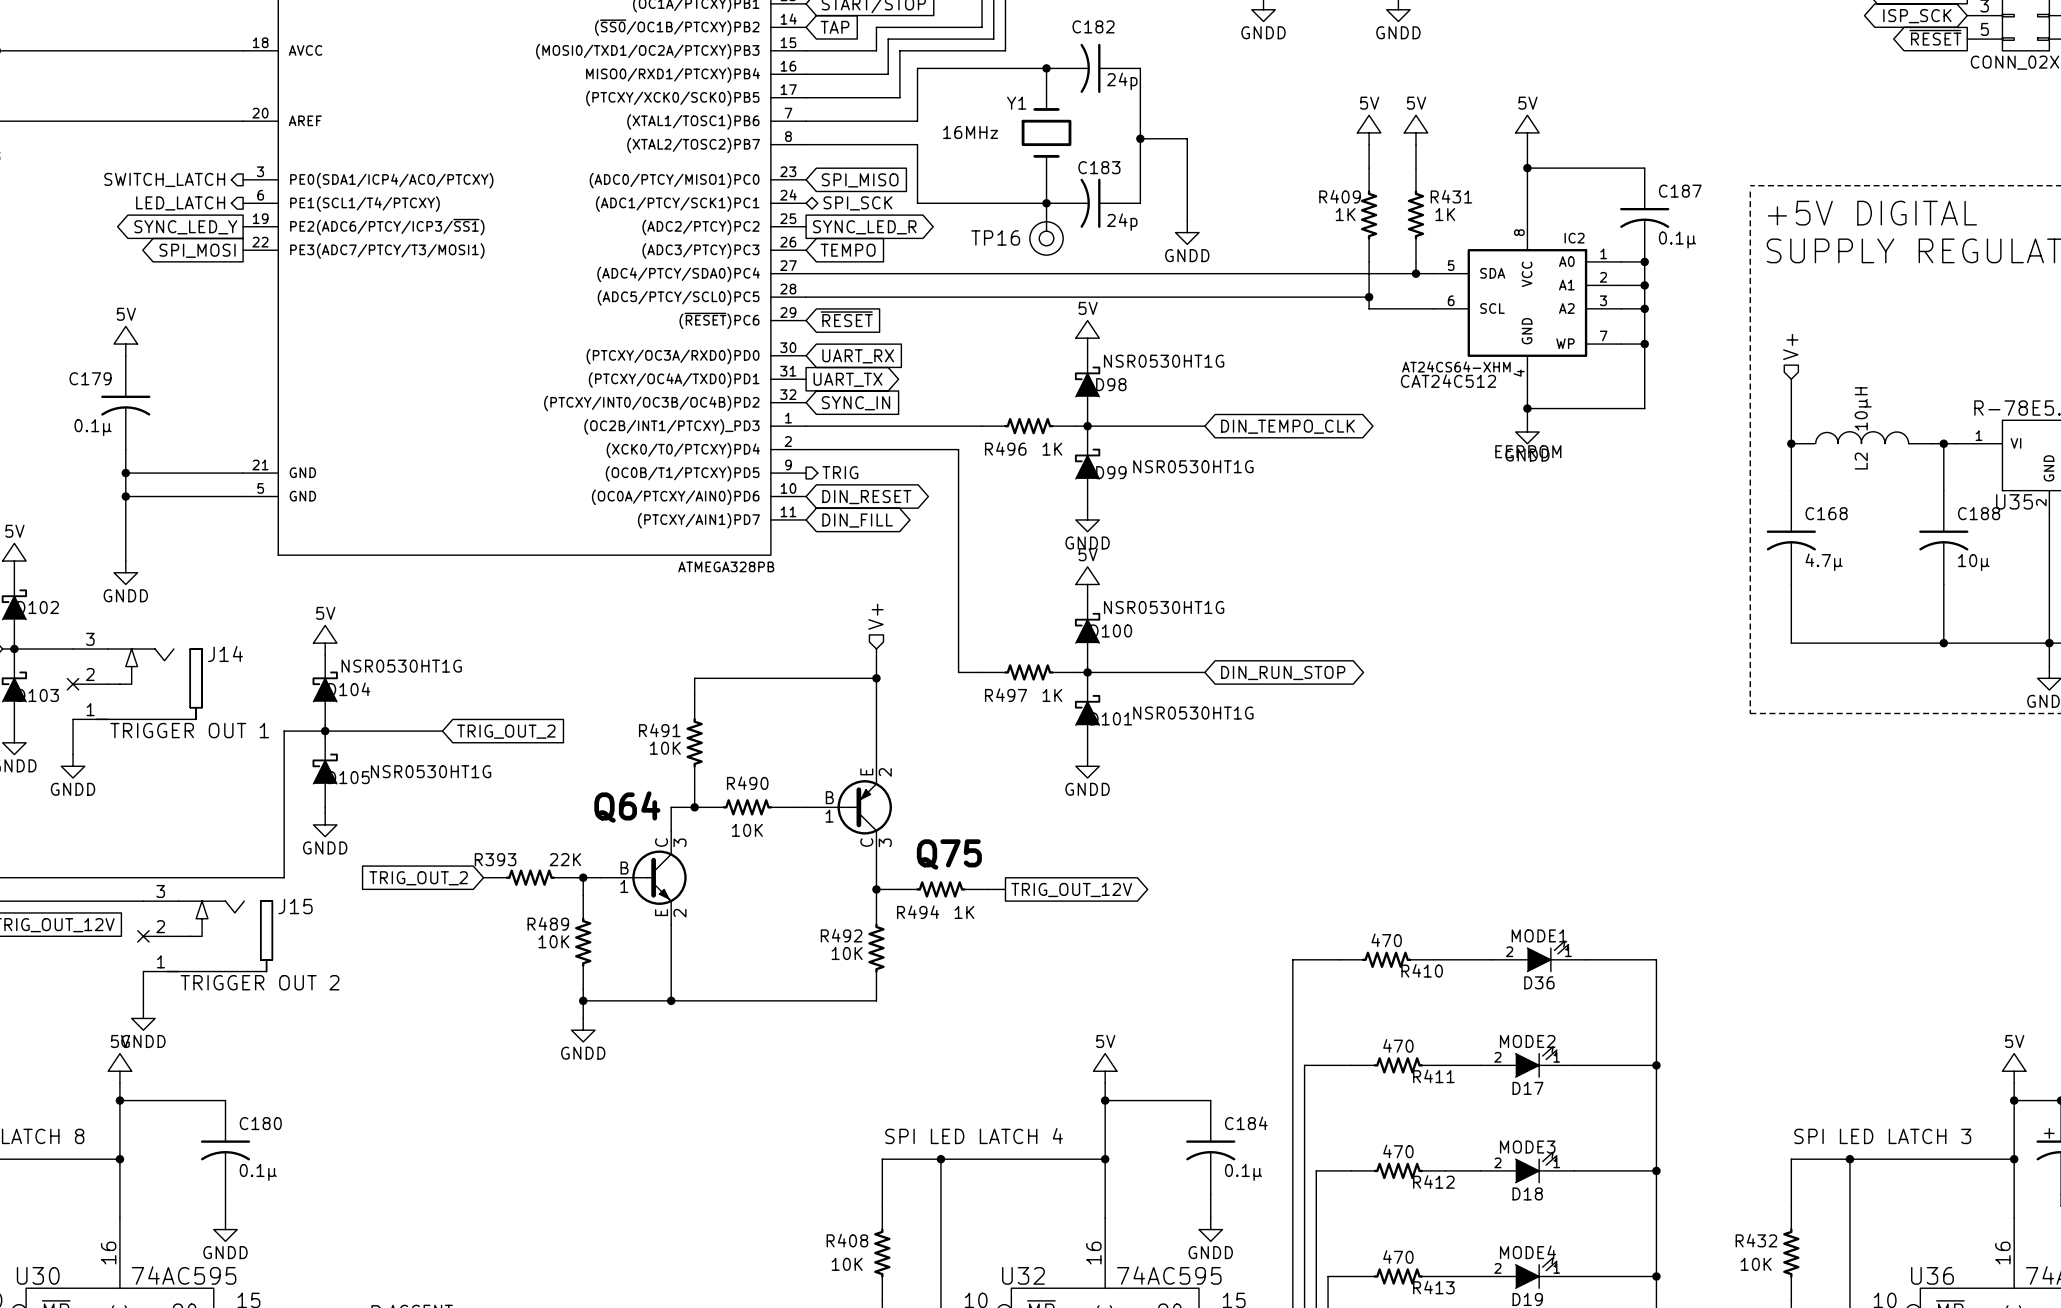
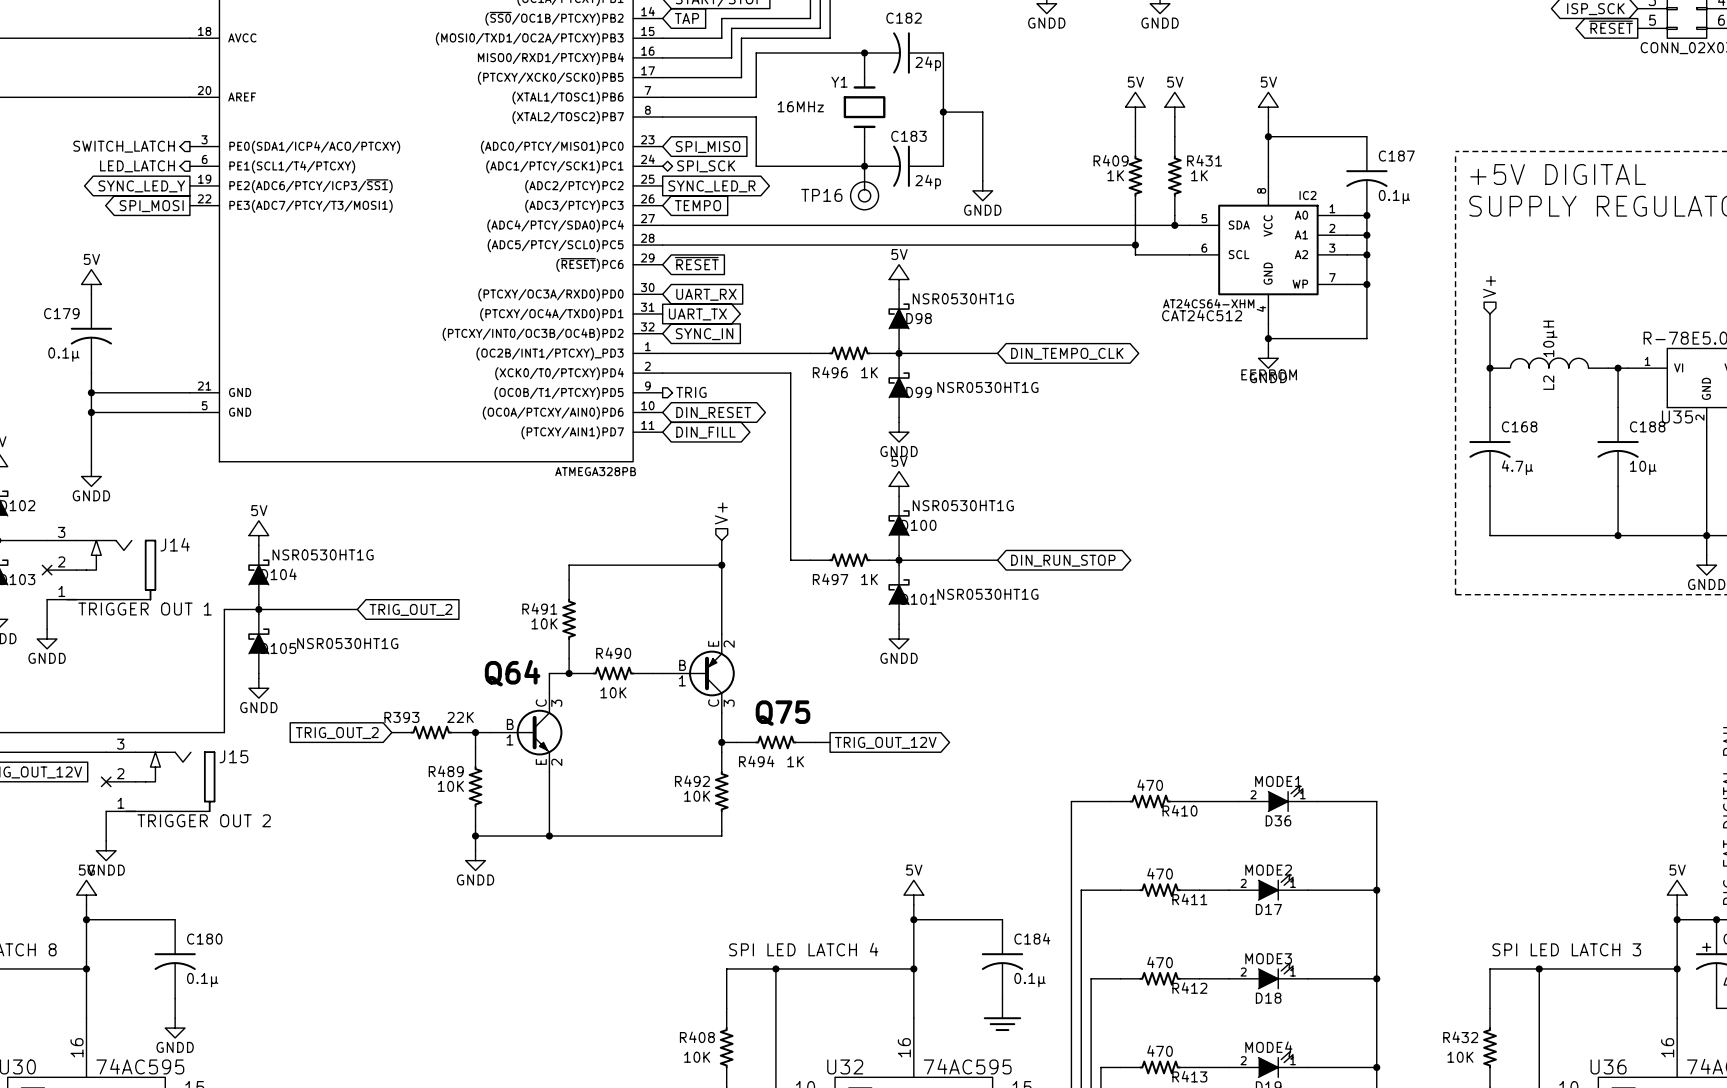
power symbol shape: [1199, 1217, 1223, 1242] -> [983, 1017, 1022, 1032]
power symbol text: GNDD (1210, 1252) -> none

